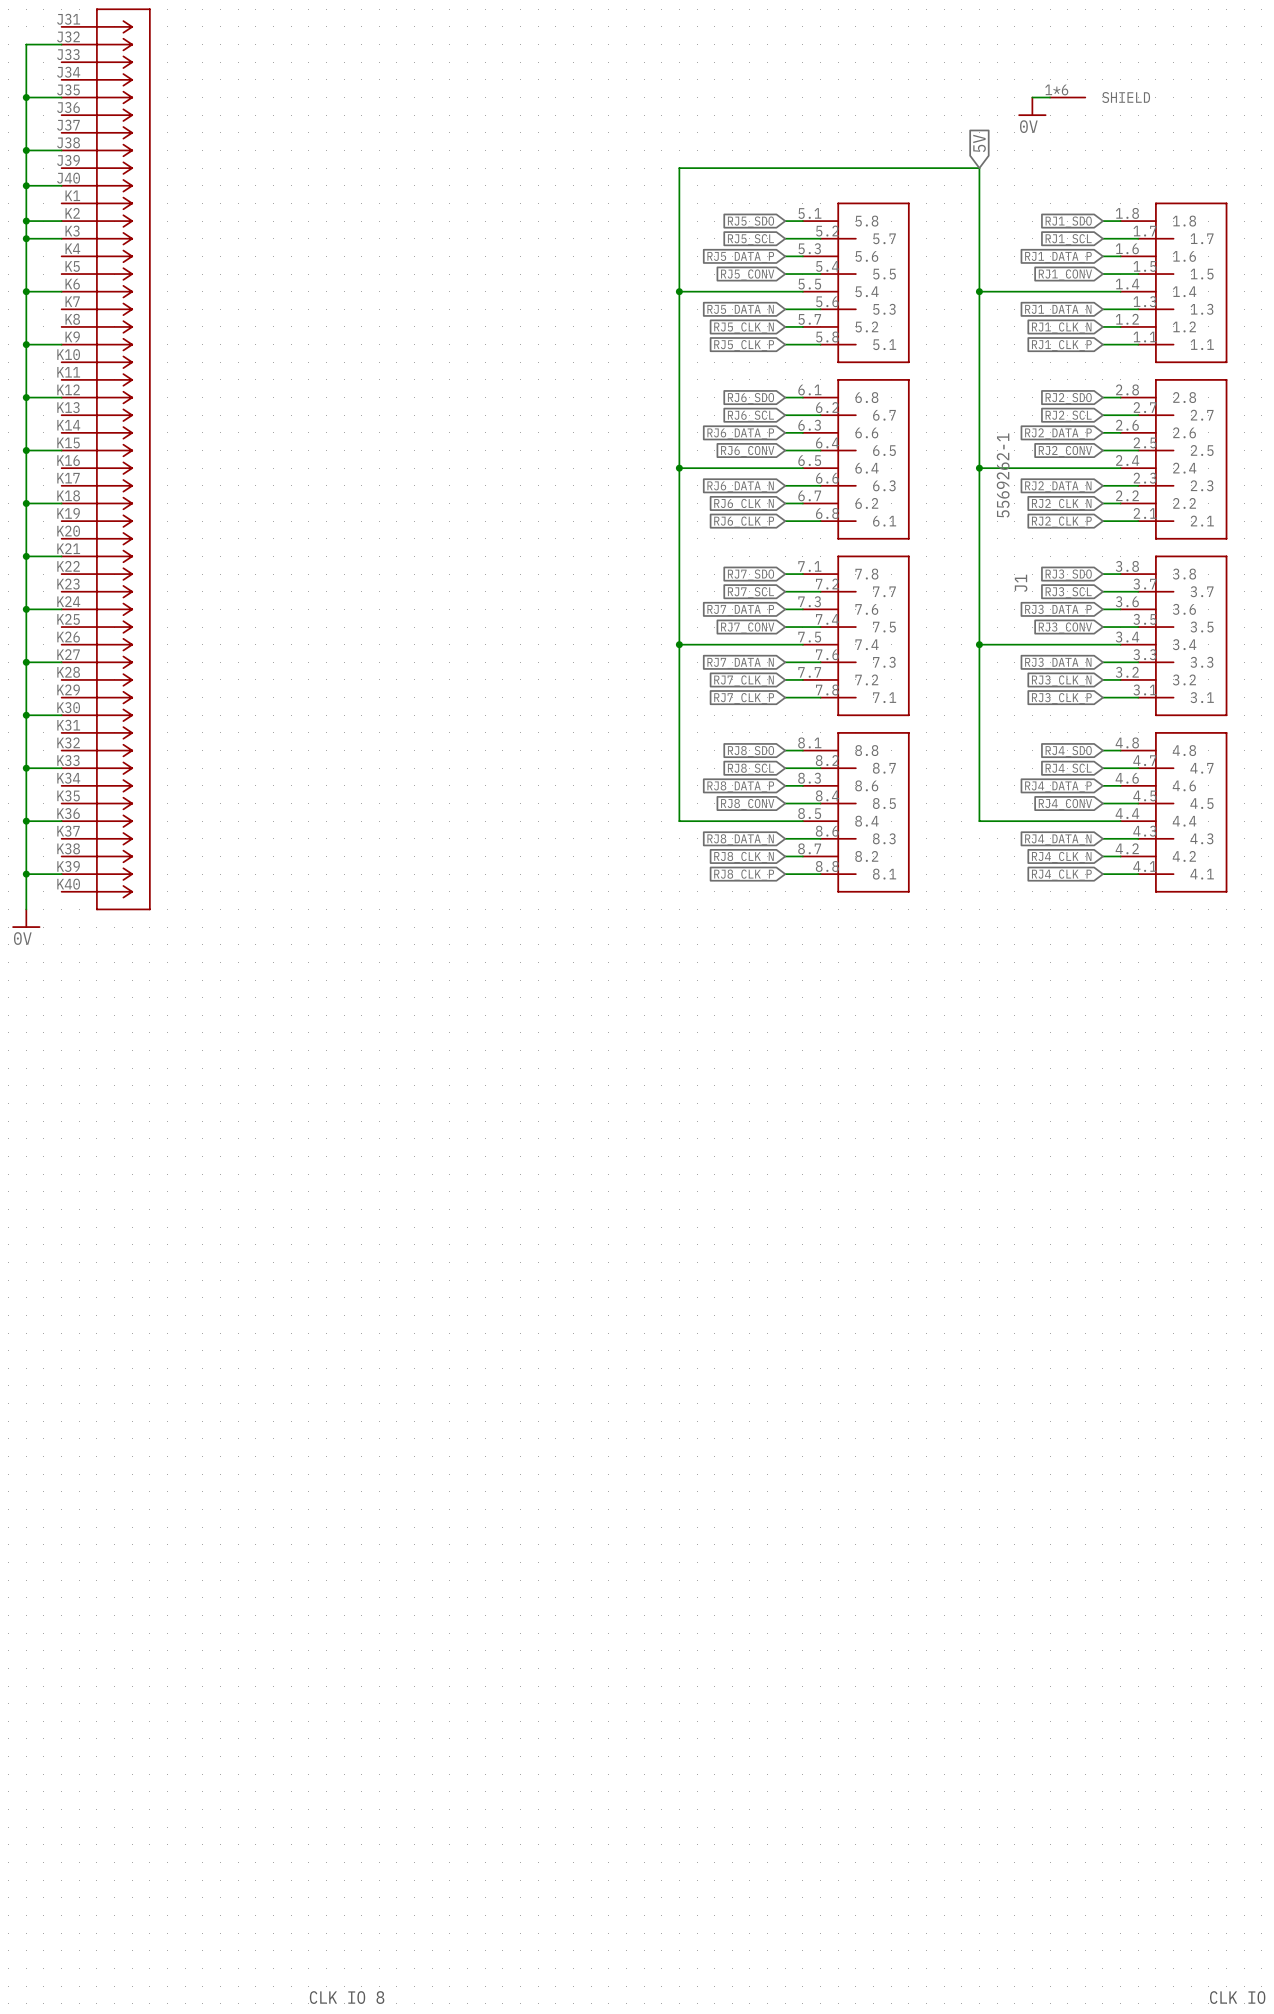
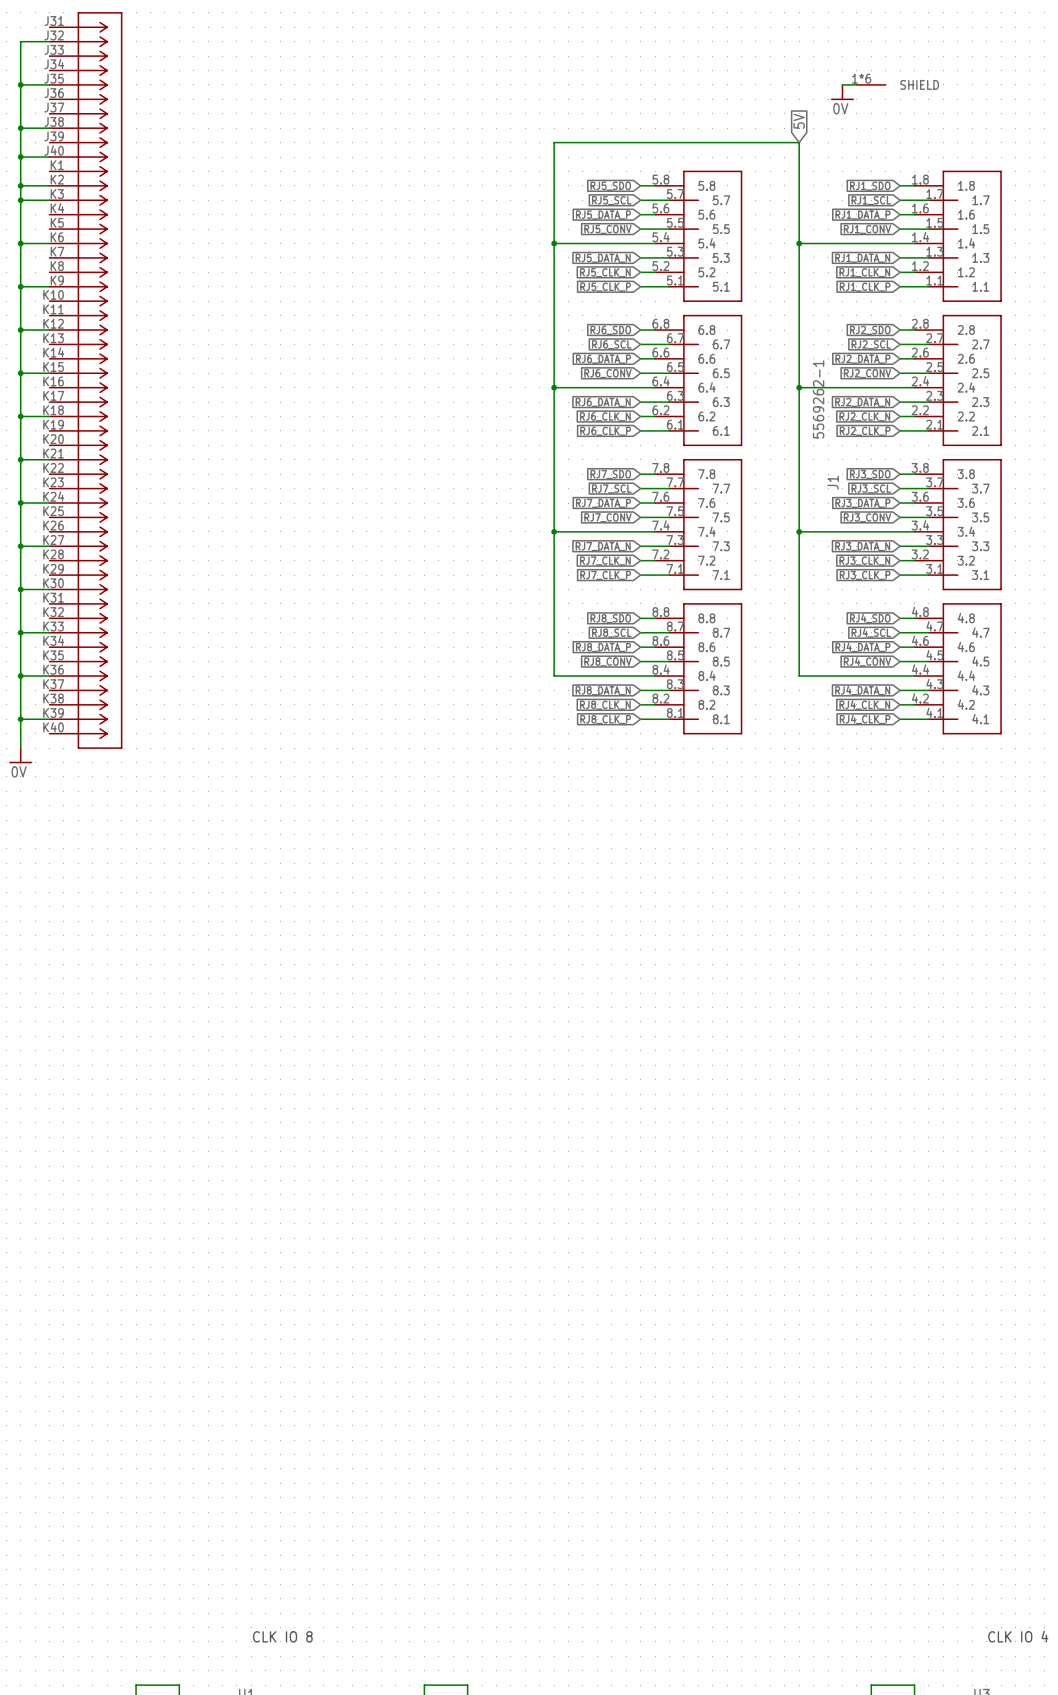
J1 symbol: [802, 97, 1228, 893] -> [655, 84, 1002, 735]

